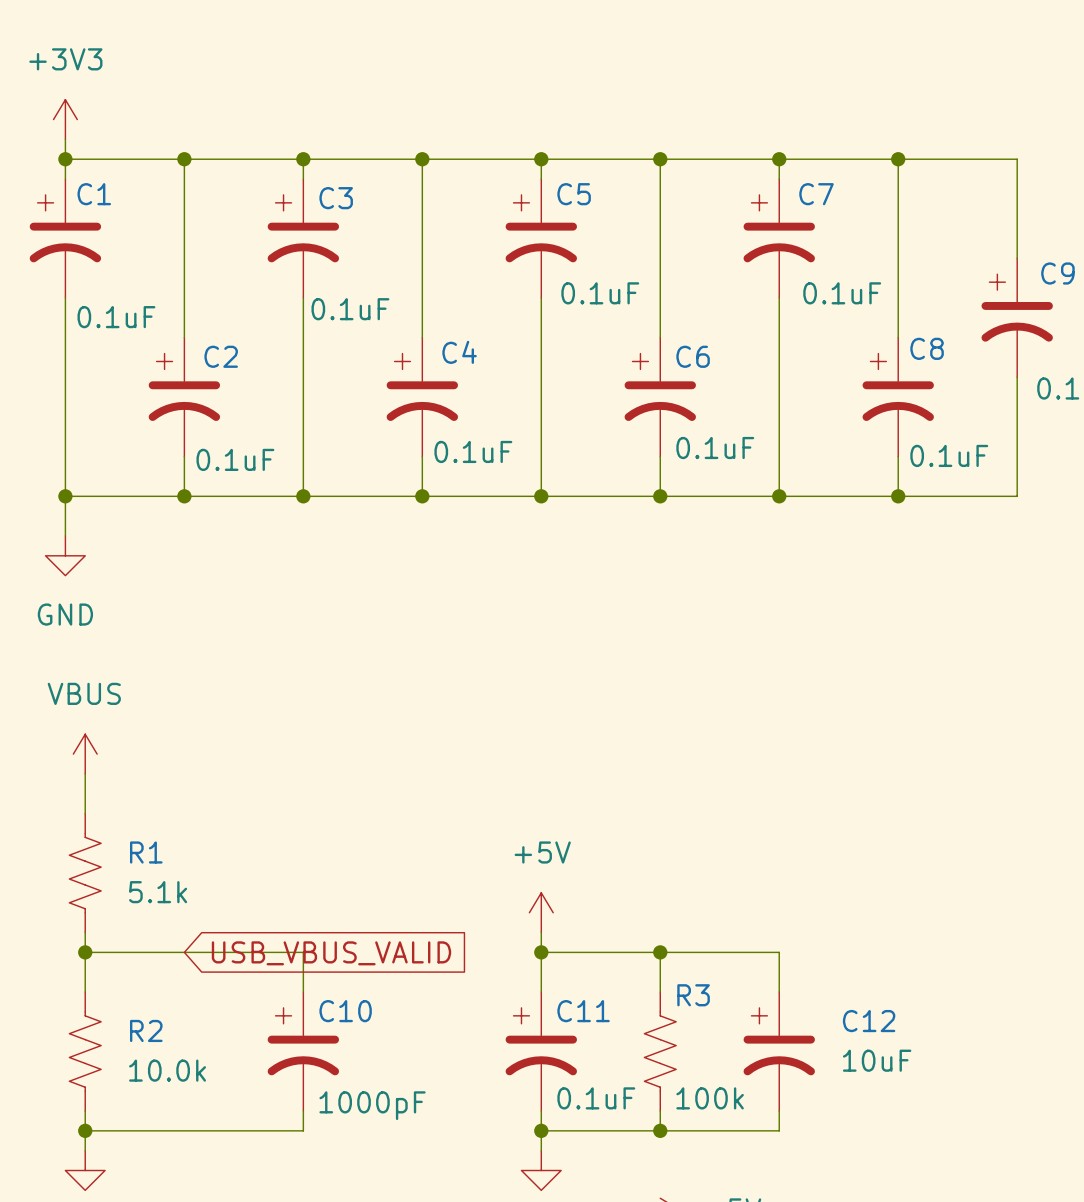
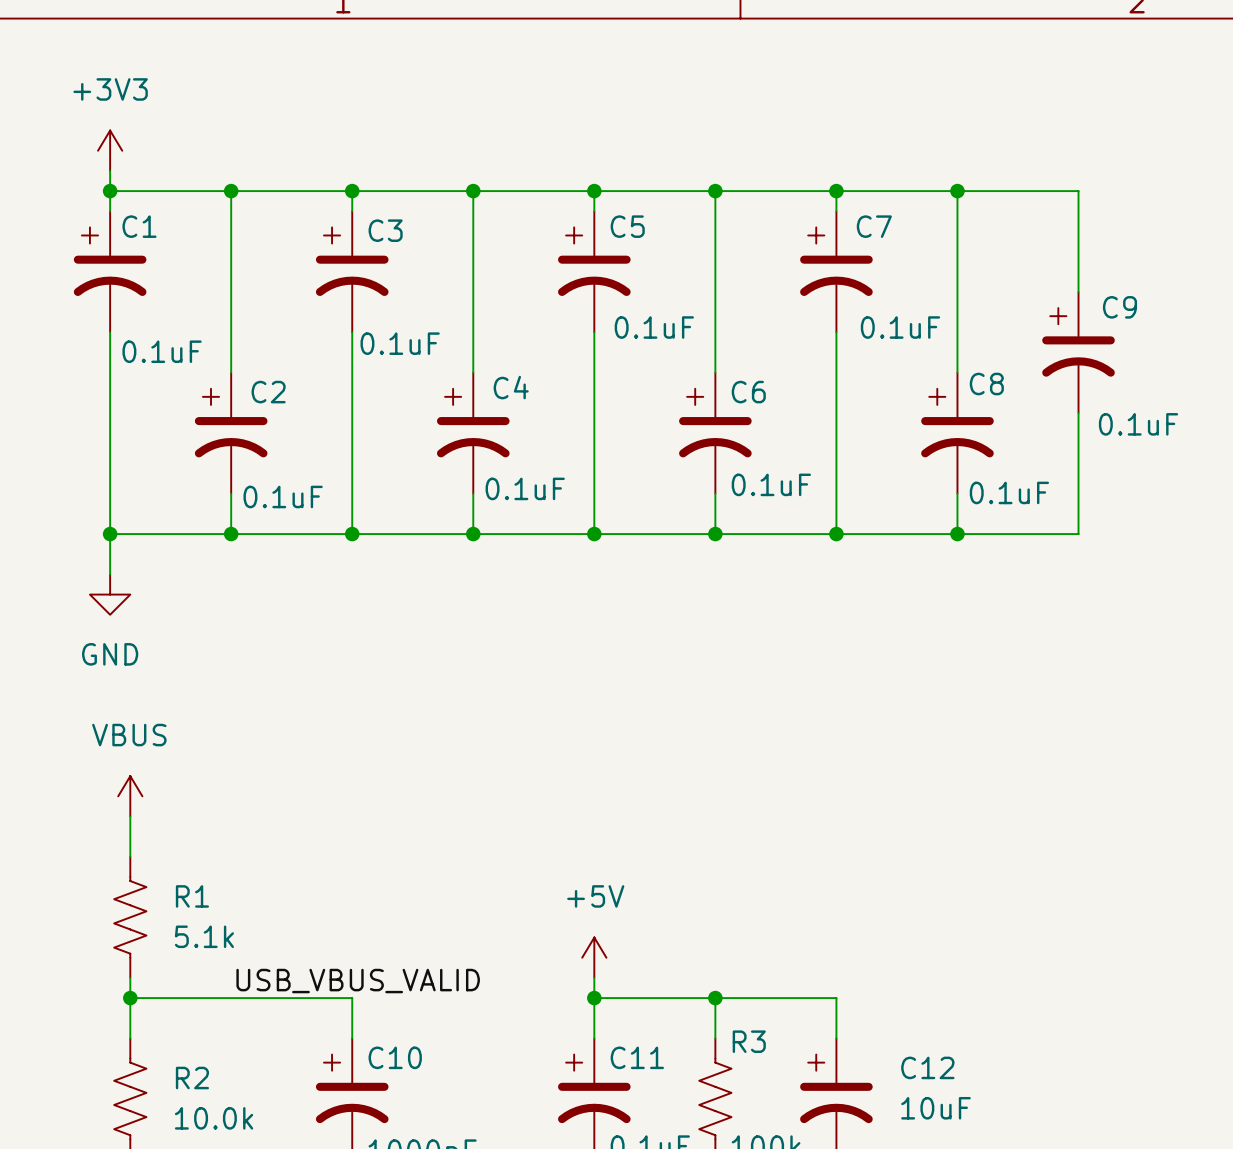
label: none -> USB_VBUS_VALID (358, 981)
global label: USB_VBUS_VALID (331, 953) -> none

